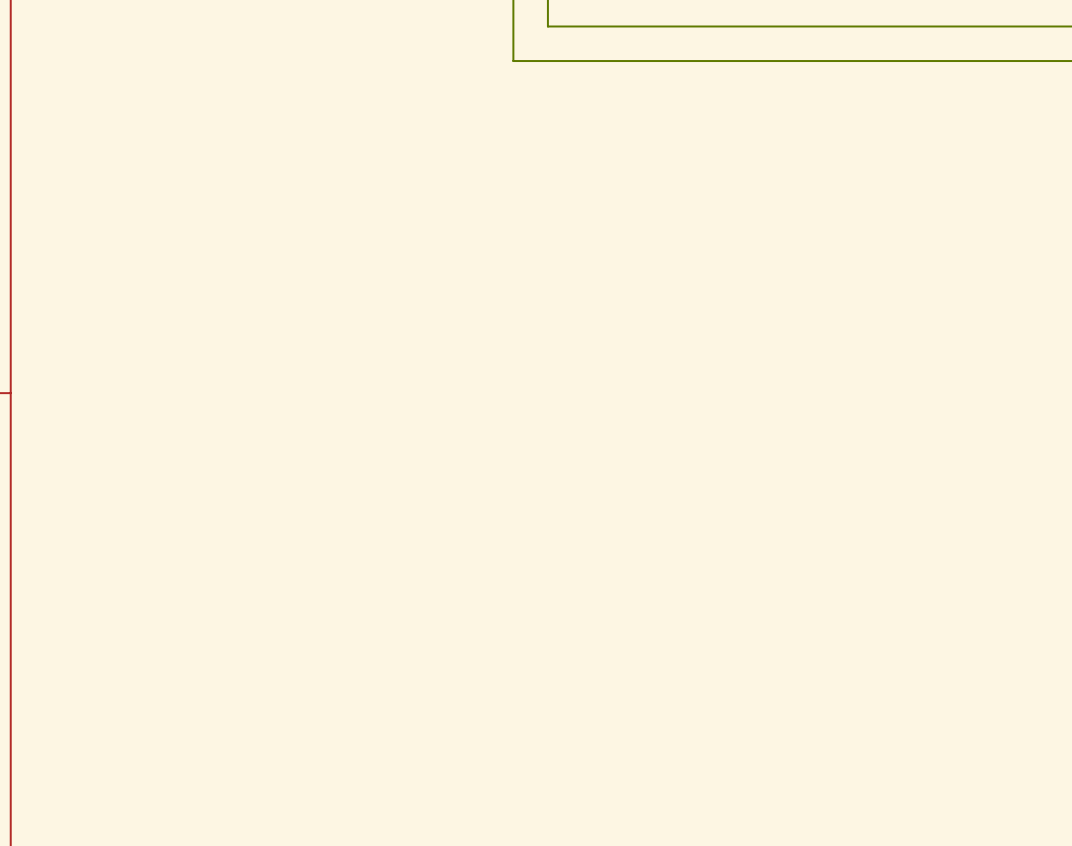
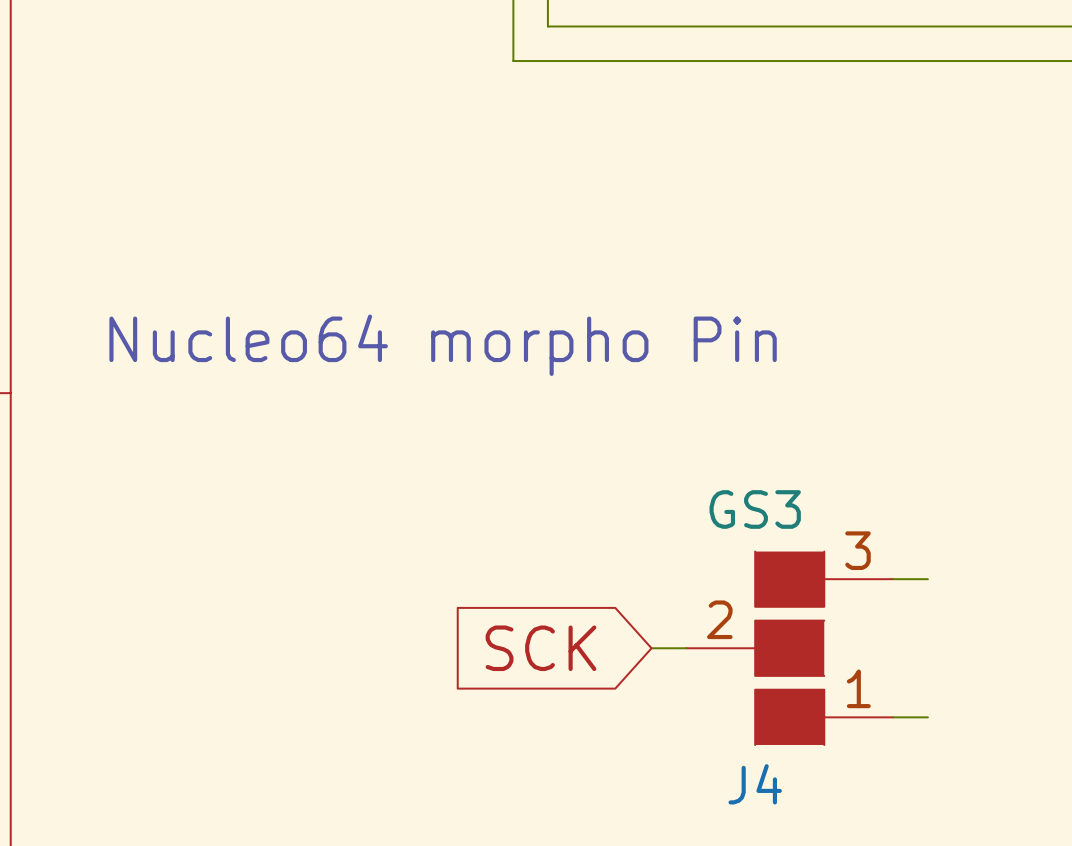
text: none -> Nucleo64 morpho Pin (443, 345)
wire: none -> (893, 579) (927, 579)
global label: none -> SCK (541, 648)
wire: none -> (651, 648) (686, 648)
J4: none -> GS3 (789, 648)
wire: none -> (893, 717) (927, 717)

